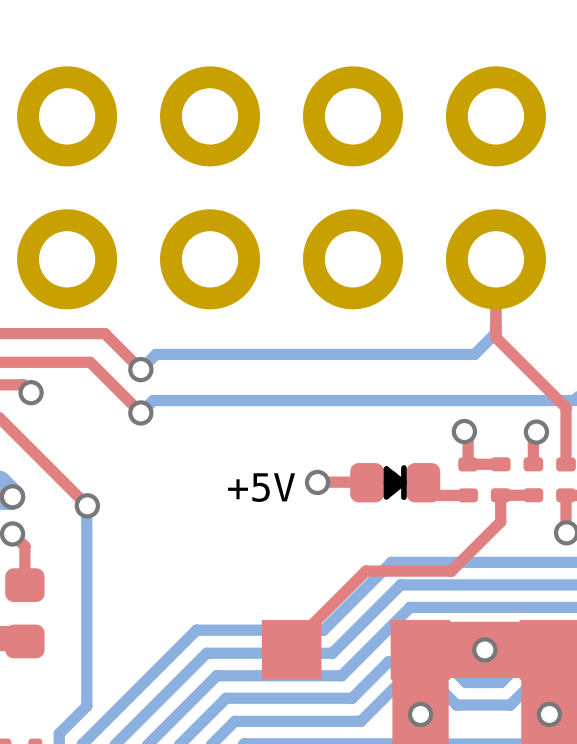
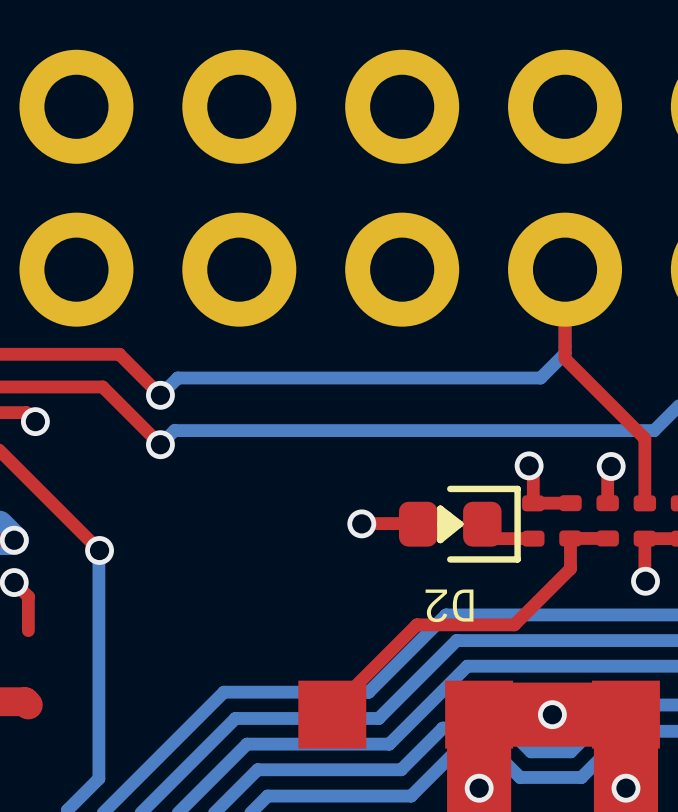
line: (403, 467) (403, 497) -> none
part: (395, 482) -> none
D2: none -> (459, 524)
text: +5V (261, 487) -> none
part: (24, 613) -> none

